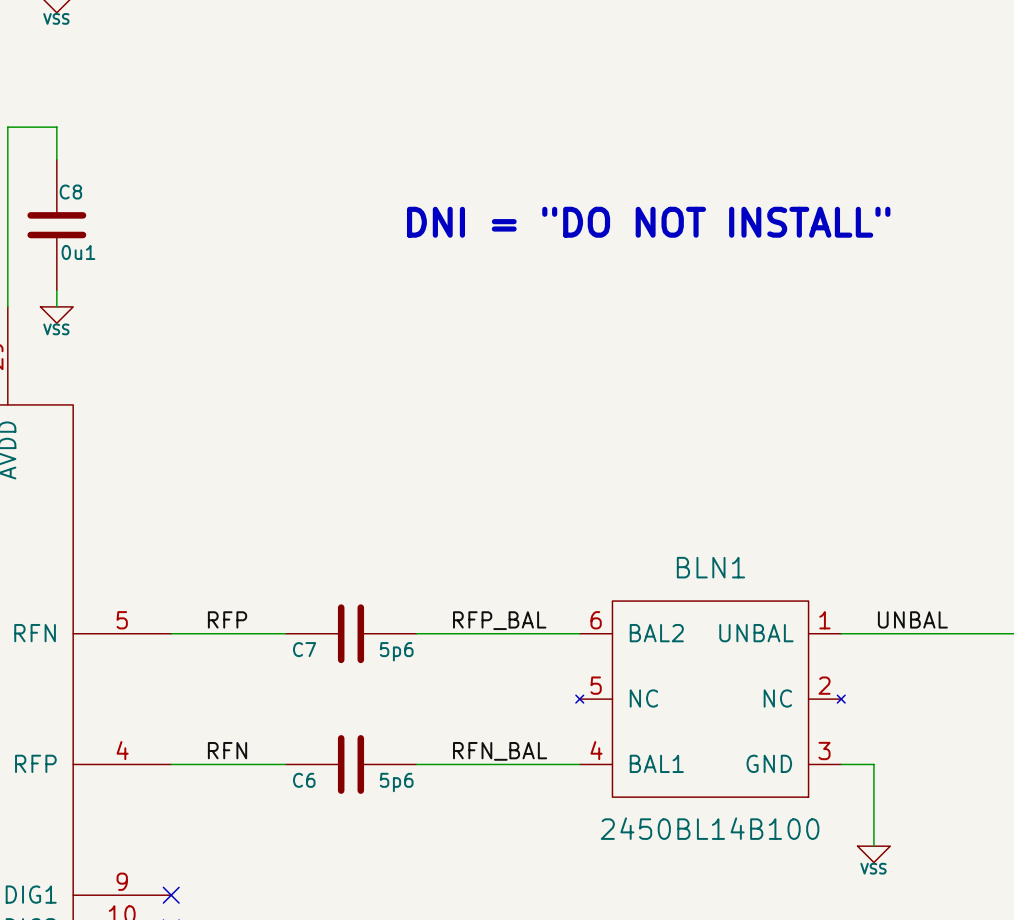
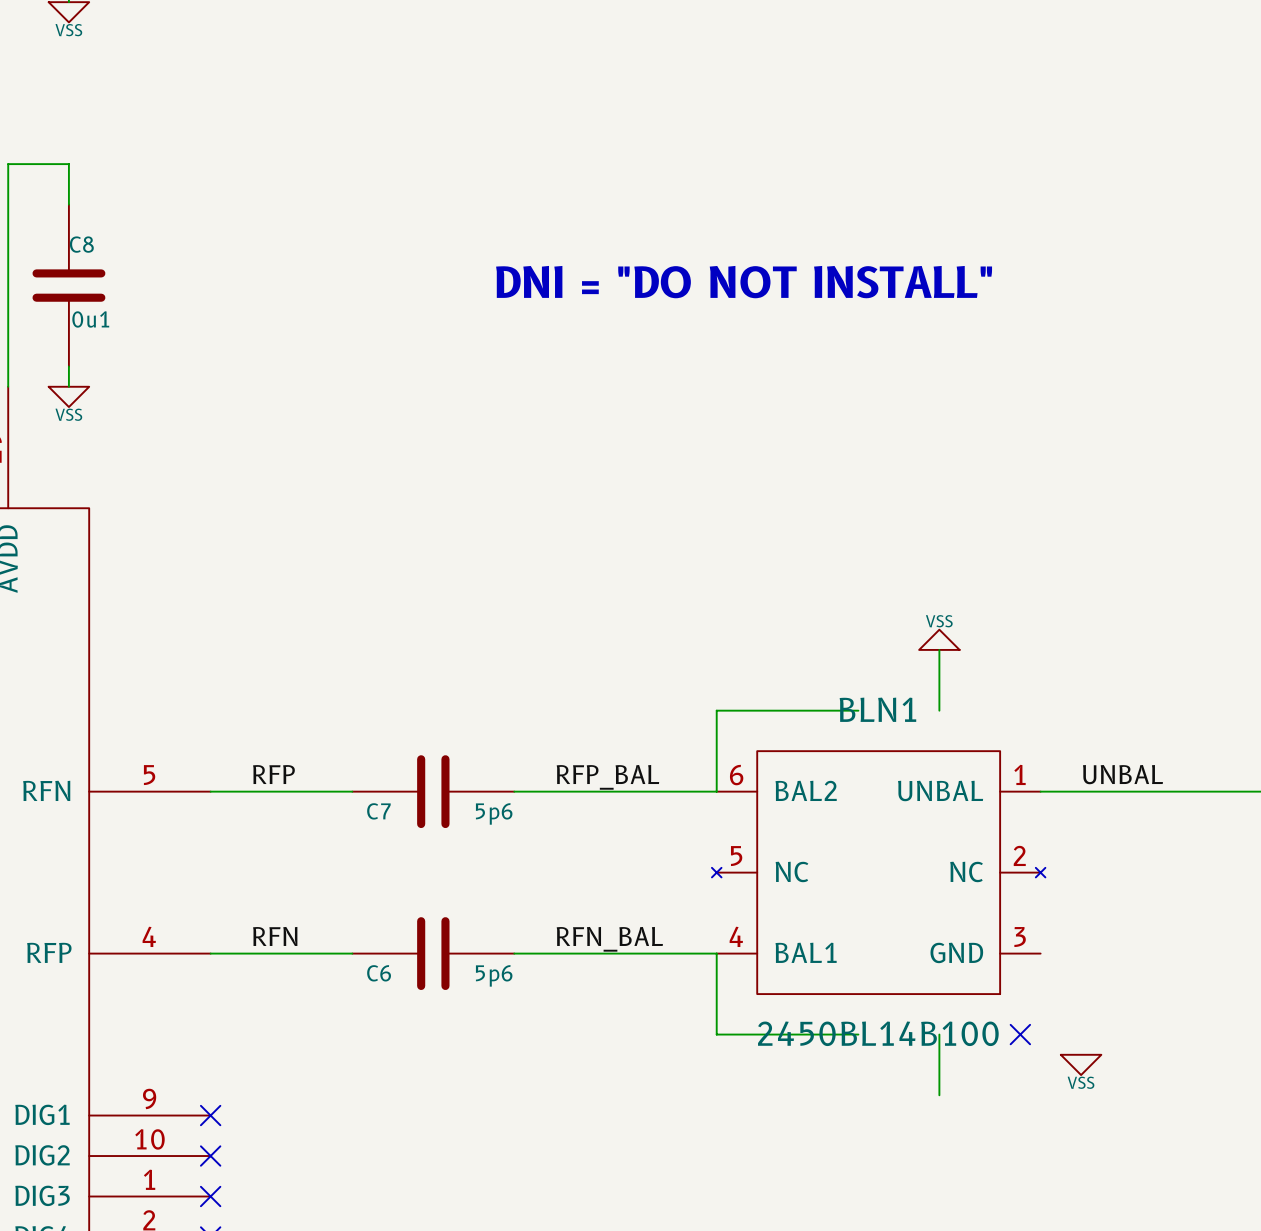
power symbol: none -> VSS (939, 639)
wire: none -> (939, 649) (939, 710)
wire: none -> (858, 710) (716, 710) (716, 791)
wire: none -> (716, 953) (716, 1034) (858, 1034)
wire: (841, 764) (873, 764) (873, 846) -> none
wire: none -> (939, 1034) (939, 1095)
no-connect mark: none -> (1020, 1034)

